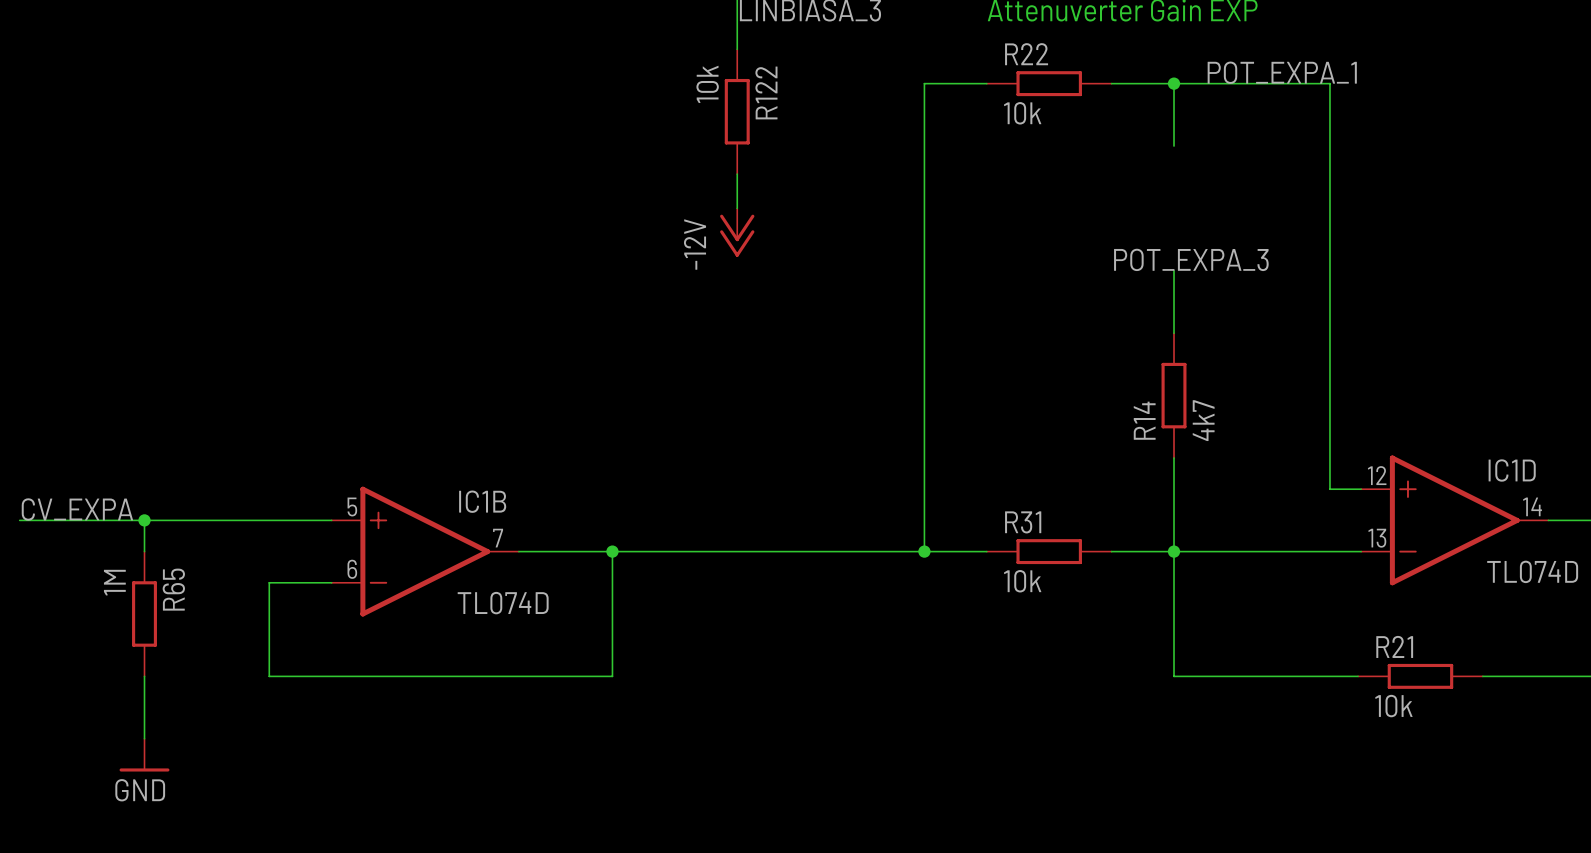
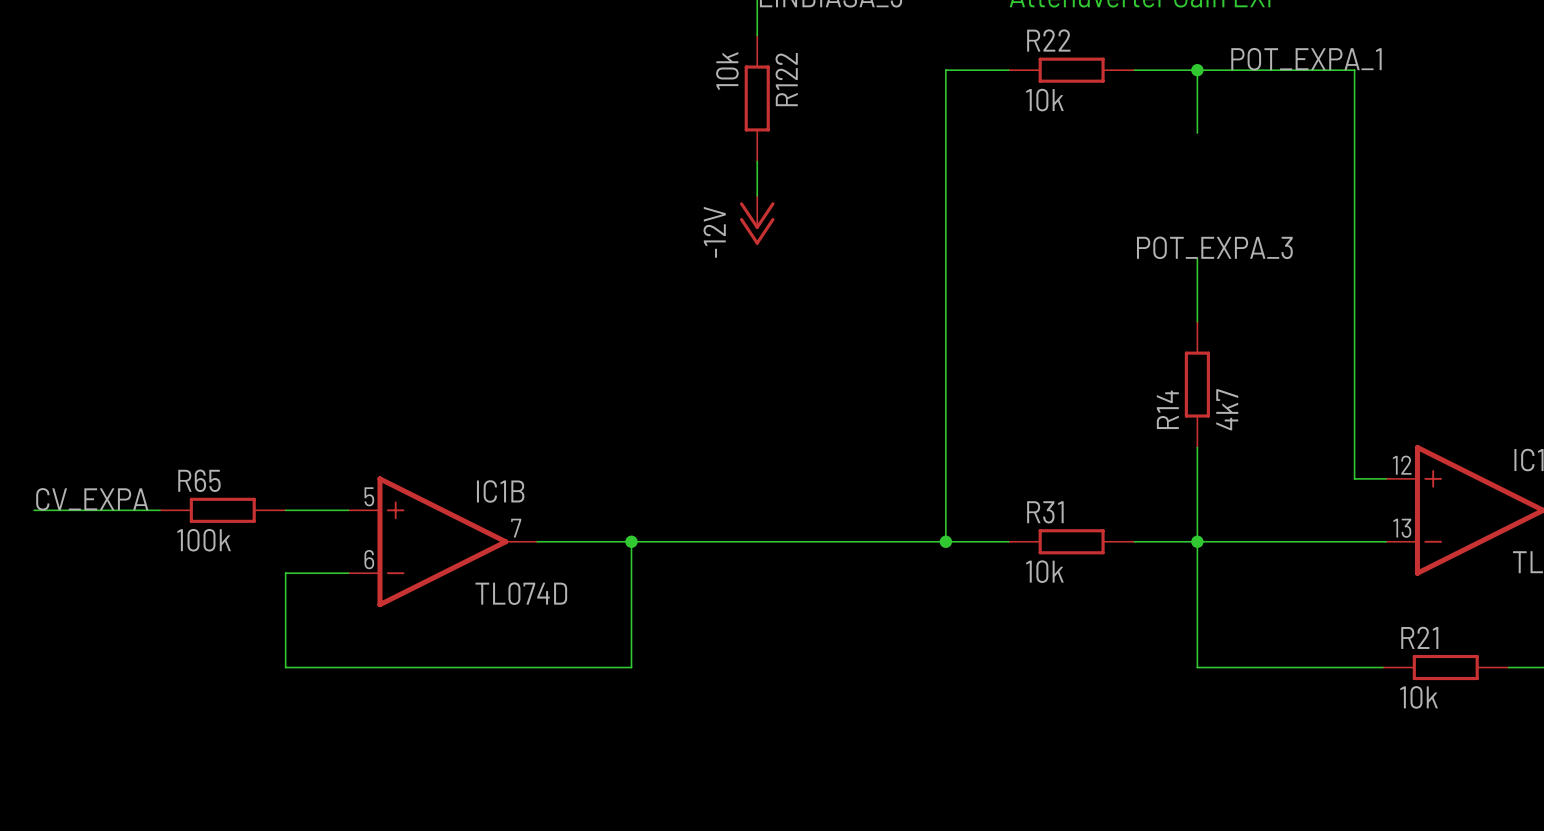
junction: (144, 520) -> none
wire: (269, 520) (144, 520) (144, 551) -> none
R65 value: 1M (114, 582) -> 100k (204, 540)
R65 name position: R65 (173, 589) -> R65 (199, 480)
R65 rotation: 0° (144, 613) -> 90° clockwise (222, 510)
R65 position: (144, 613) -> (222, 510)
wire: (144, 676) (144, 738) -> none
power symbol: GND (144, 755) -> none

